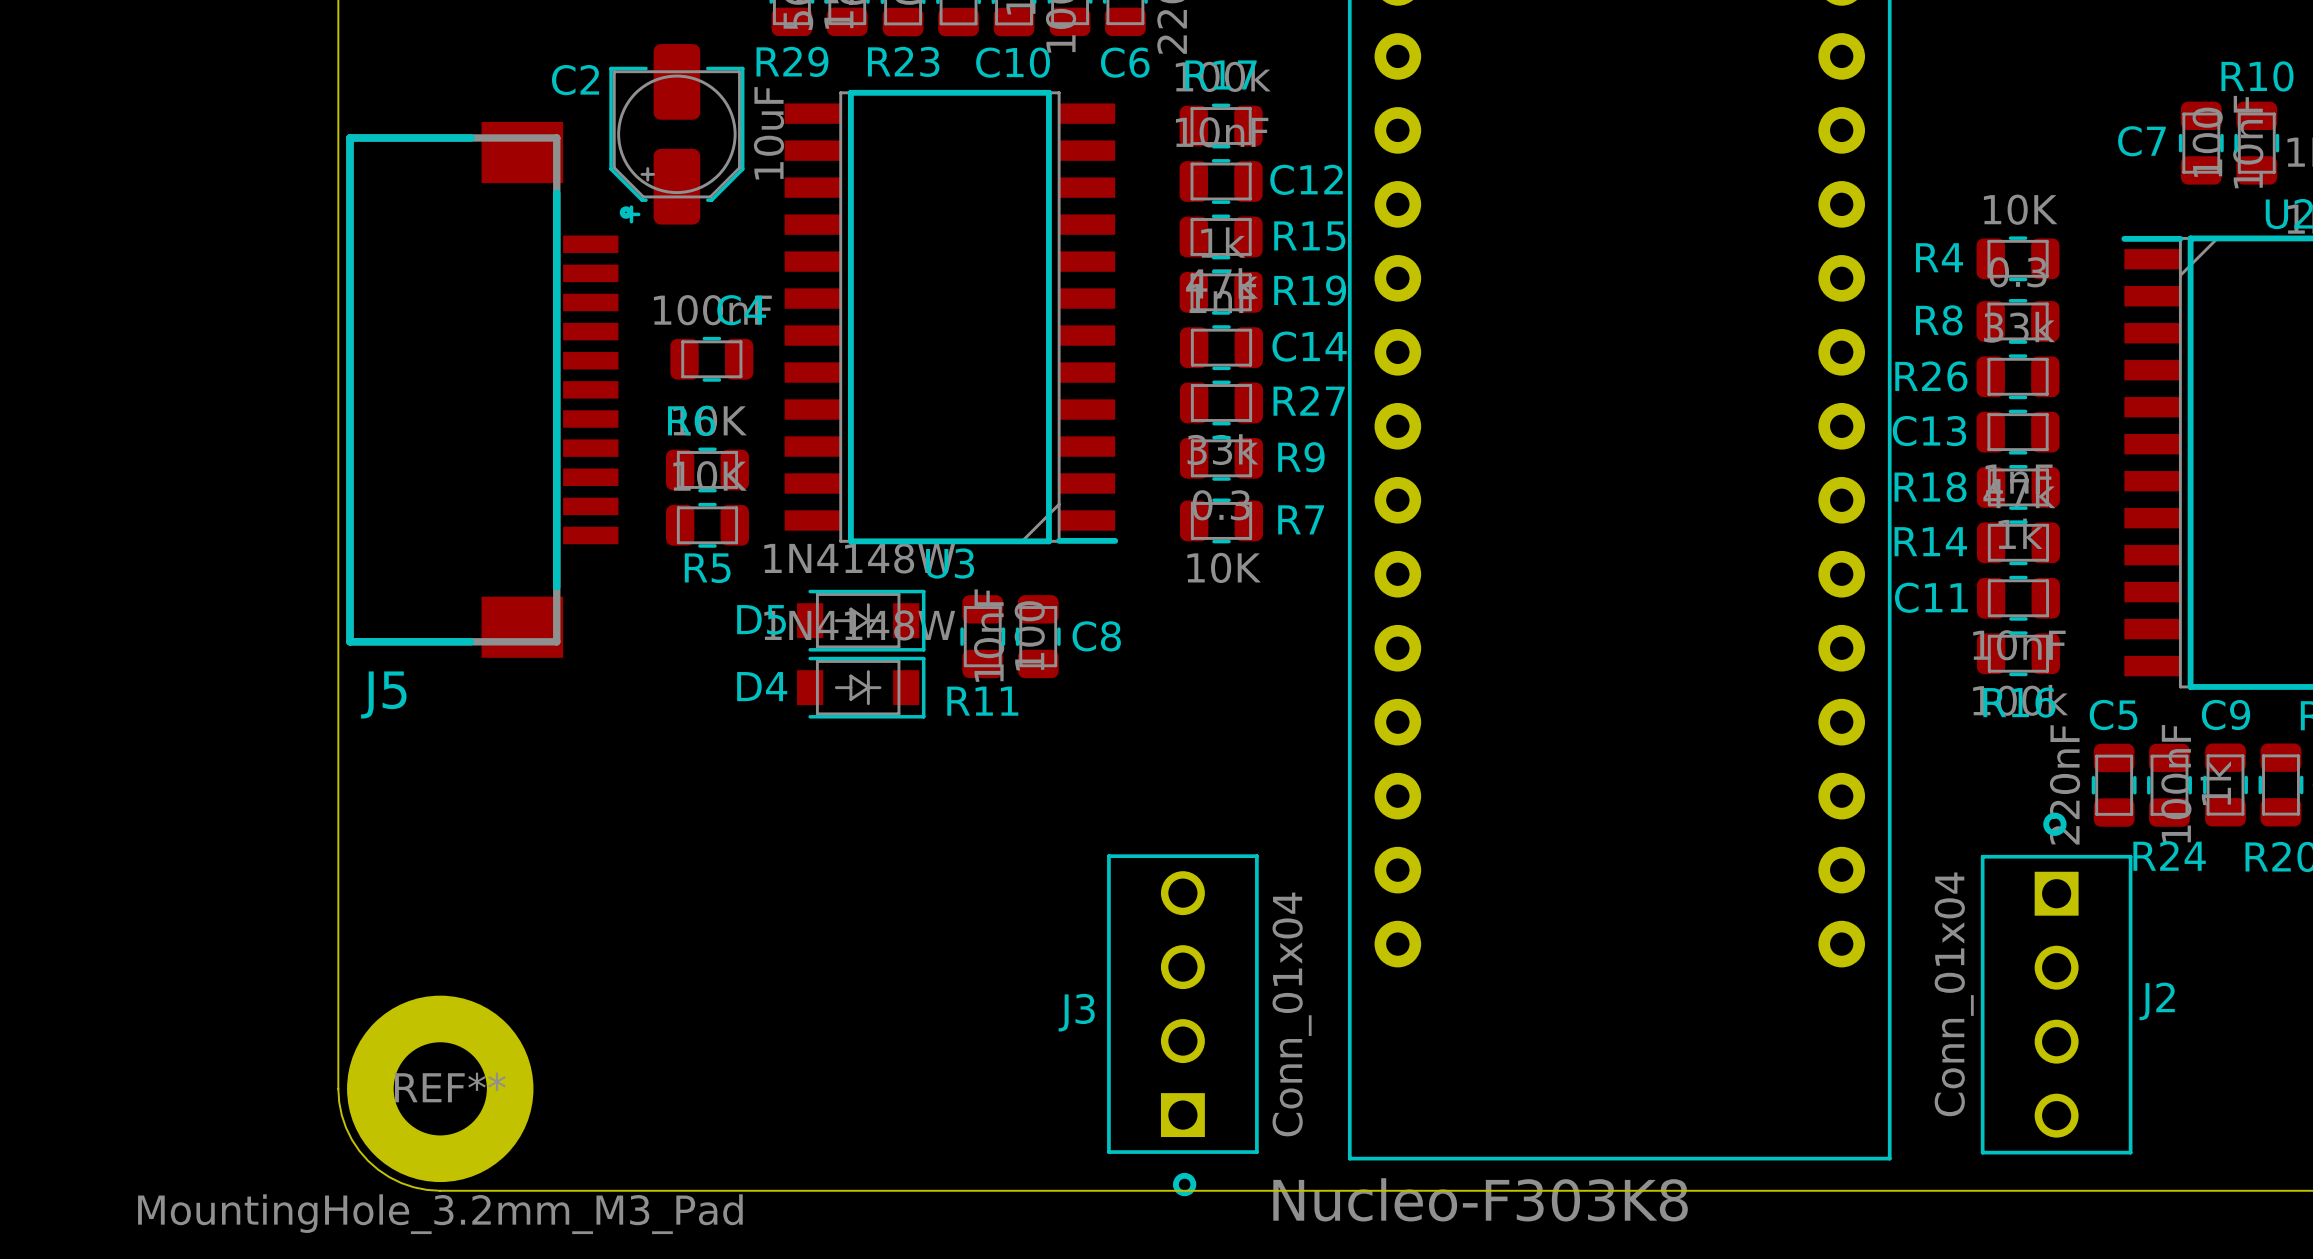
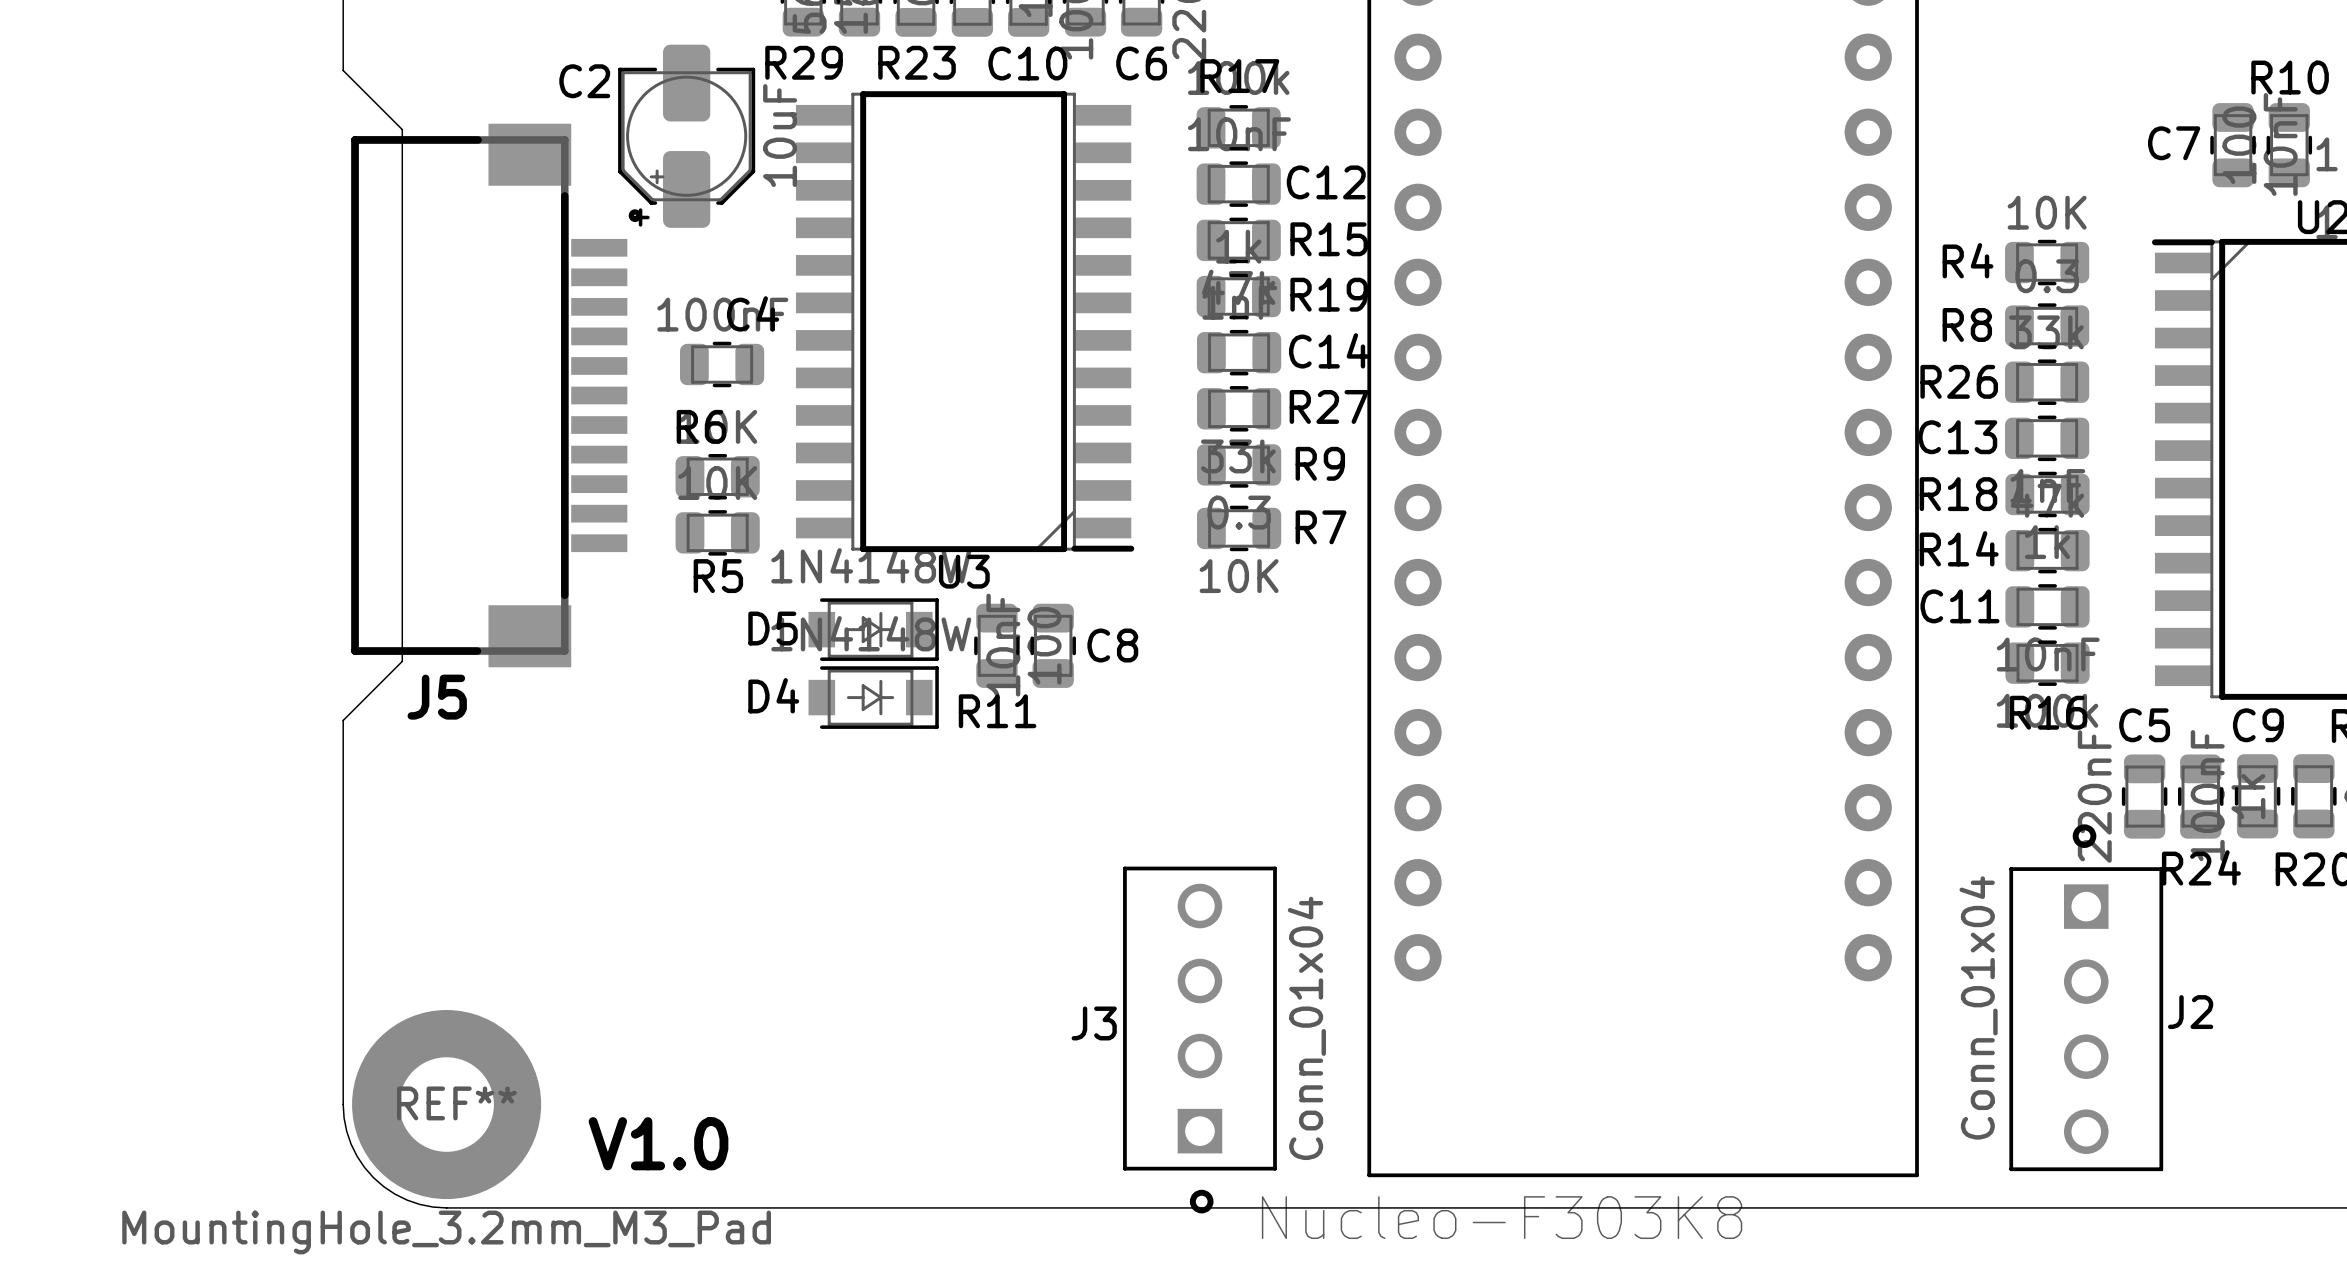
board edge: (338, 69) (338, 710) -> (343, 70) (402, 129) (402, 661) (343, 720)
J5 name position: J5 (383, 694) -> J5 (437, 697)
text: none -> V1.0 (658, 1143)

